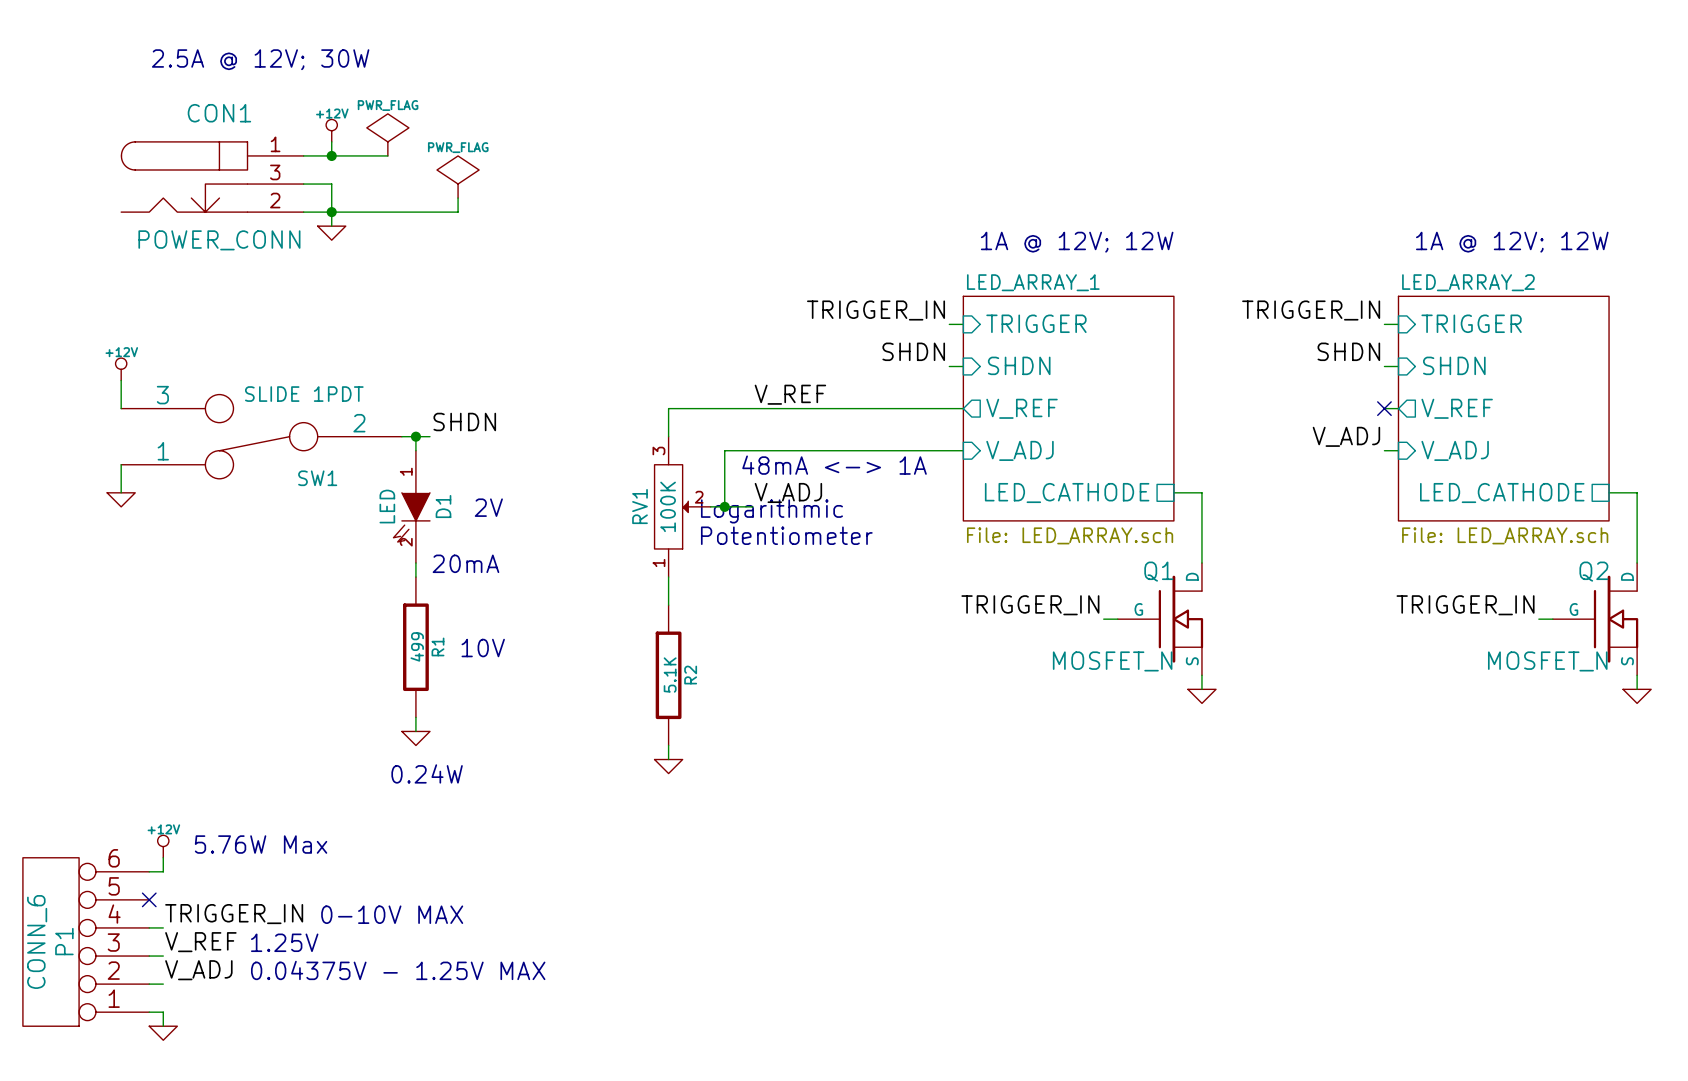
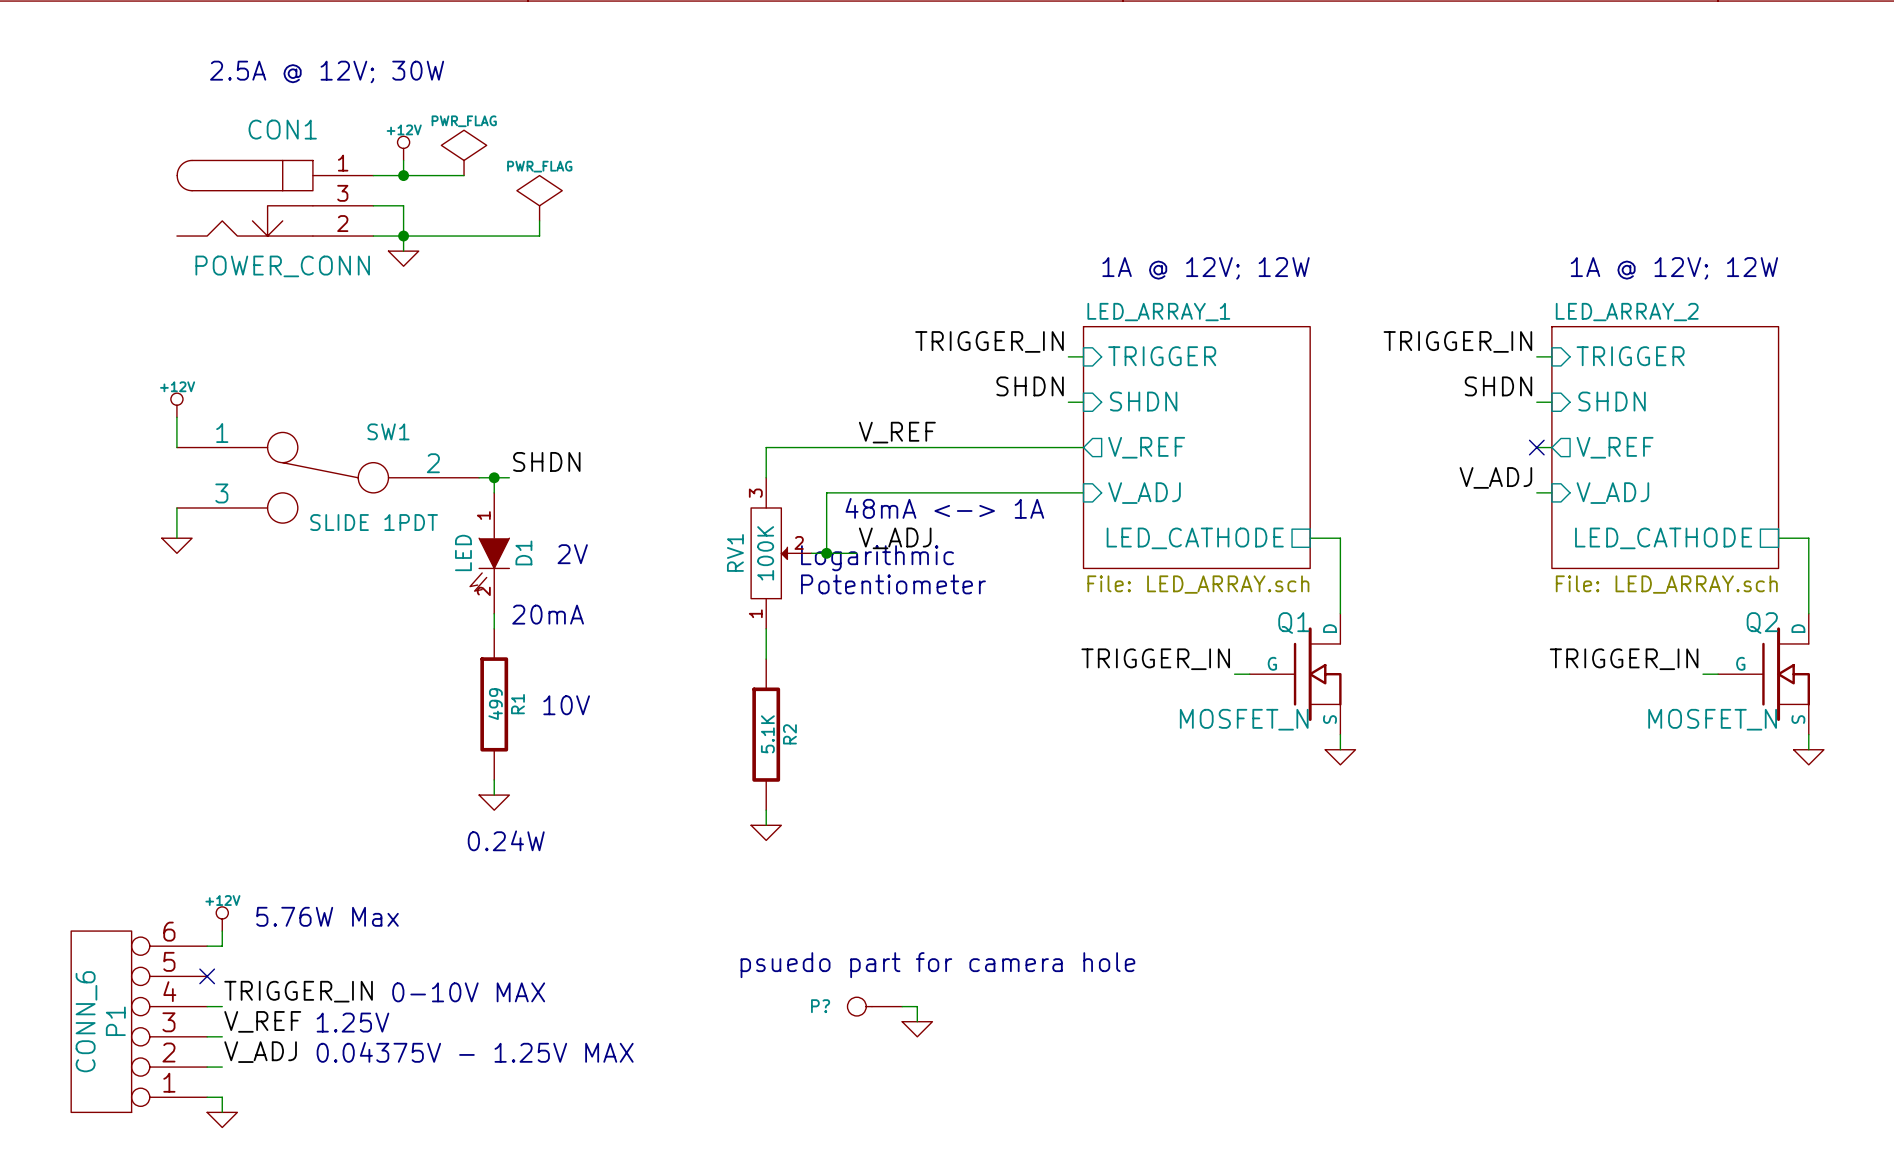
SW1 flip: as is (261, 436) -> up-down (328, 477)
text: none -> psuedo part for camera hole (937, 965)
P?: none -> (874, 1006)
wire: none -> (902, 1006) (917, 1006) (917, 1021)
power symbol: none -> (917, 1029)

